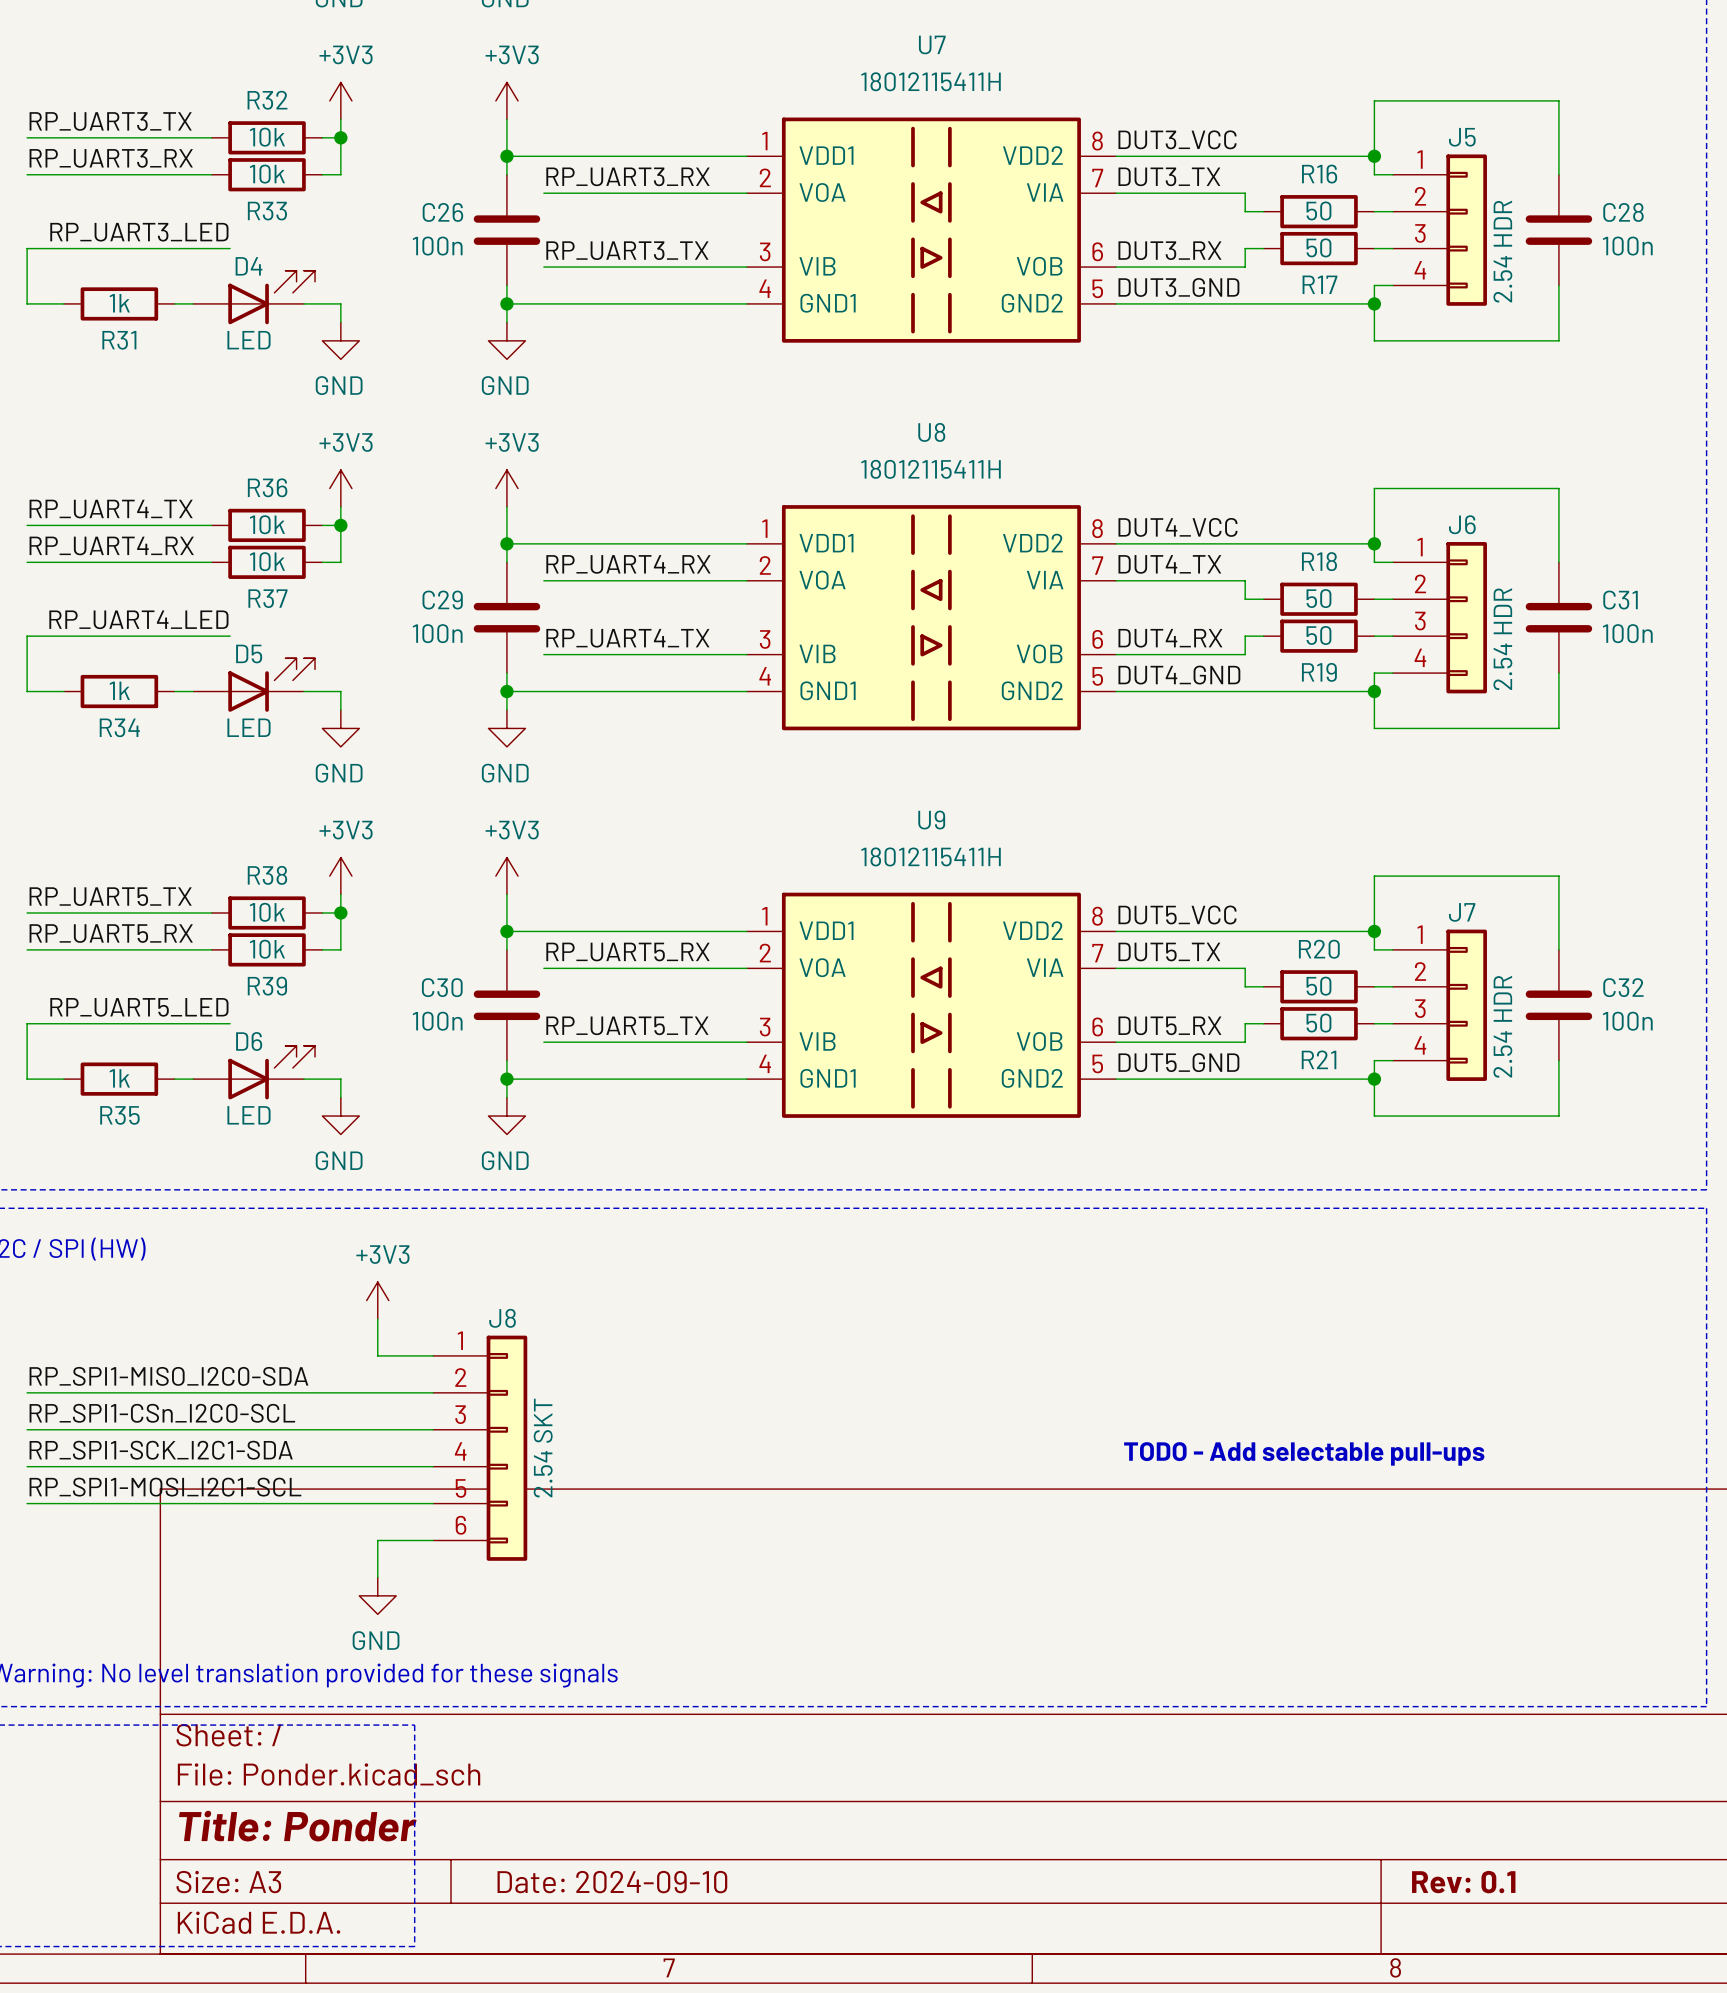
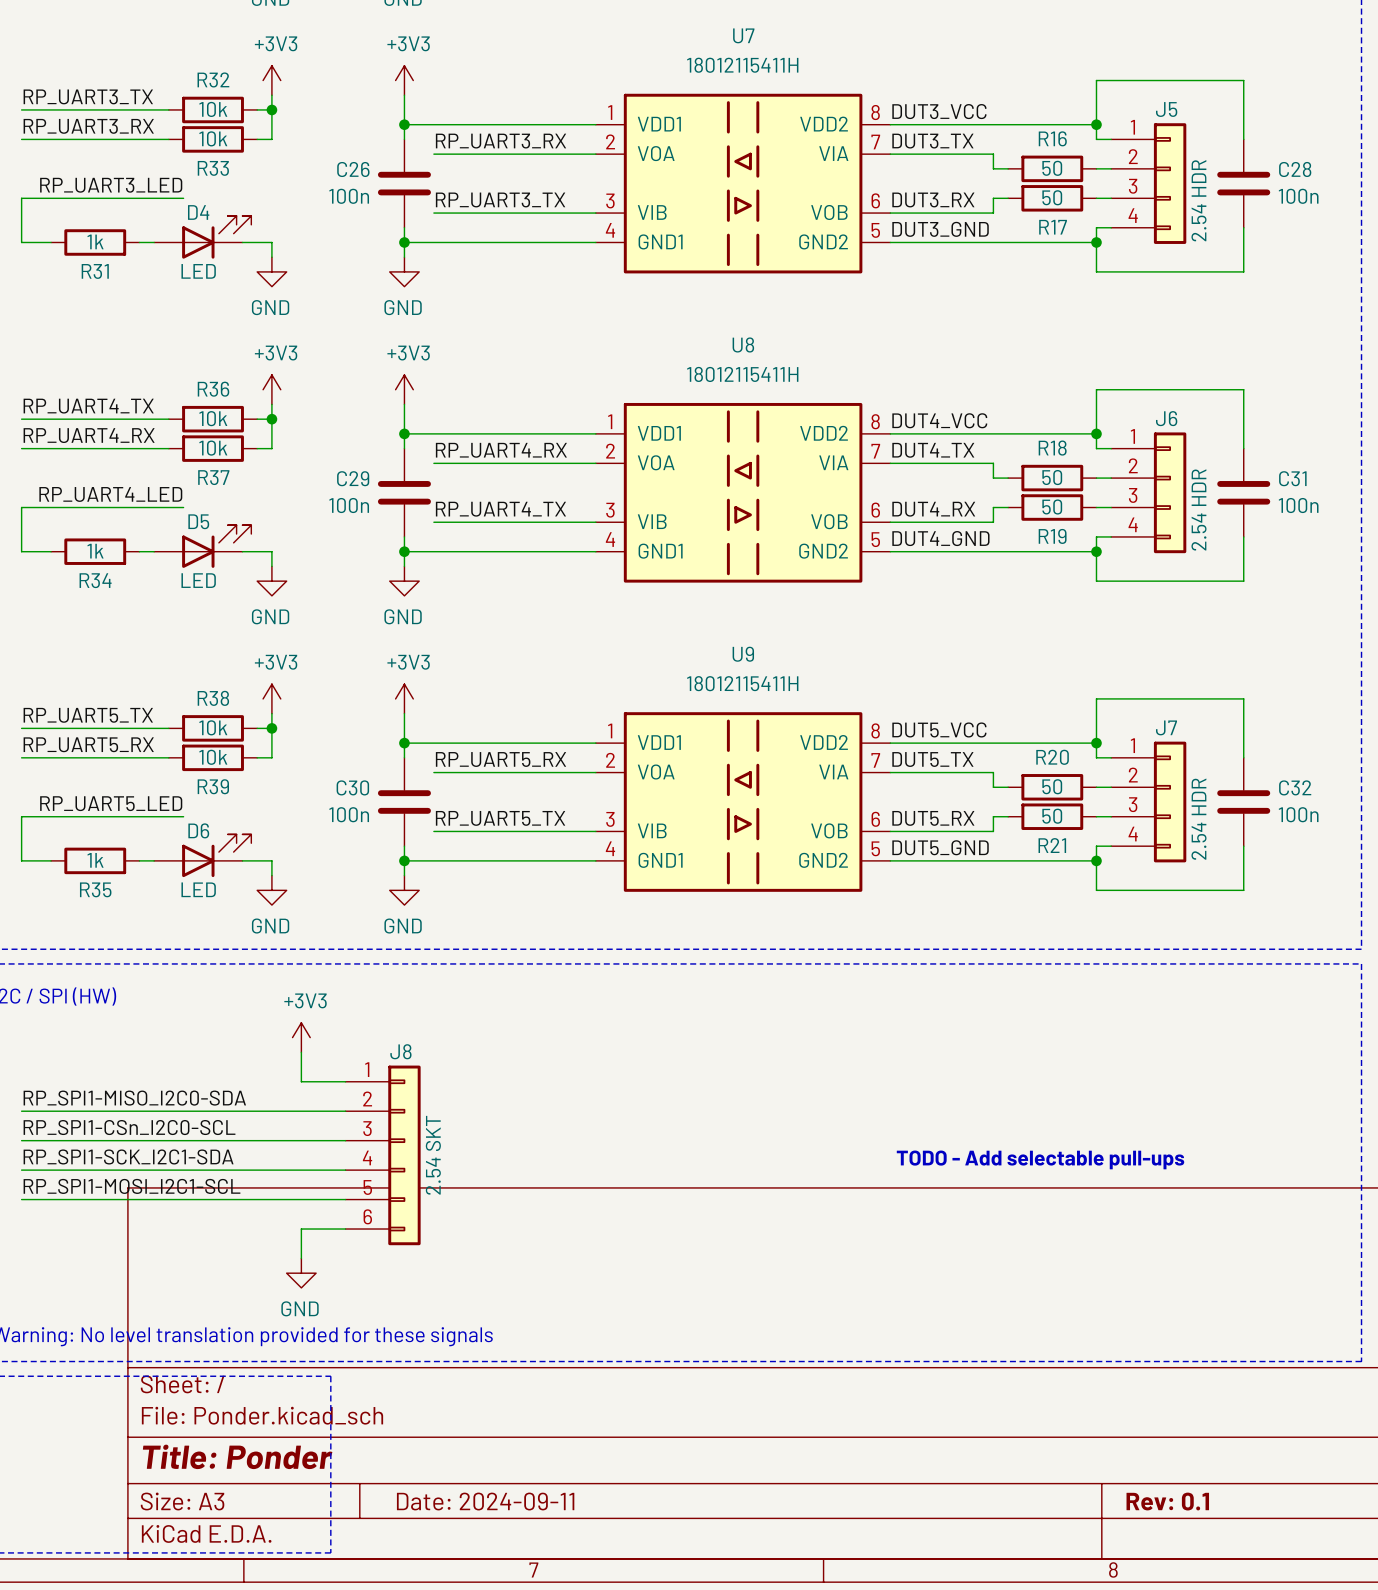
title block: Date: 2024-09-10 (612, 1882) -> Date: 2024-09-11 (485, 1501)

